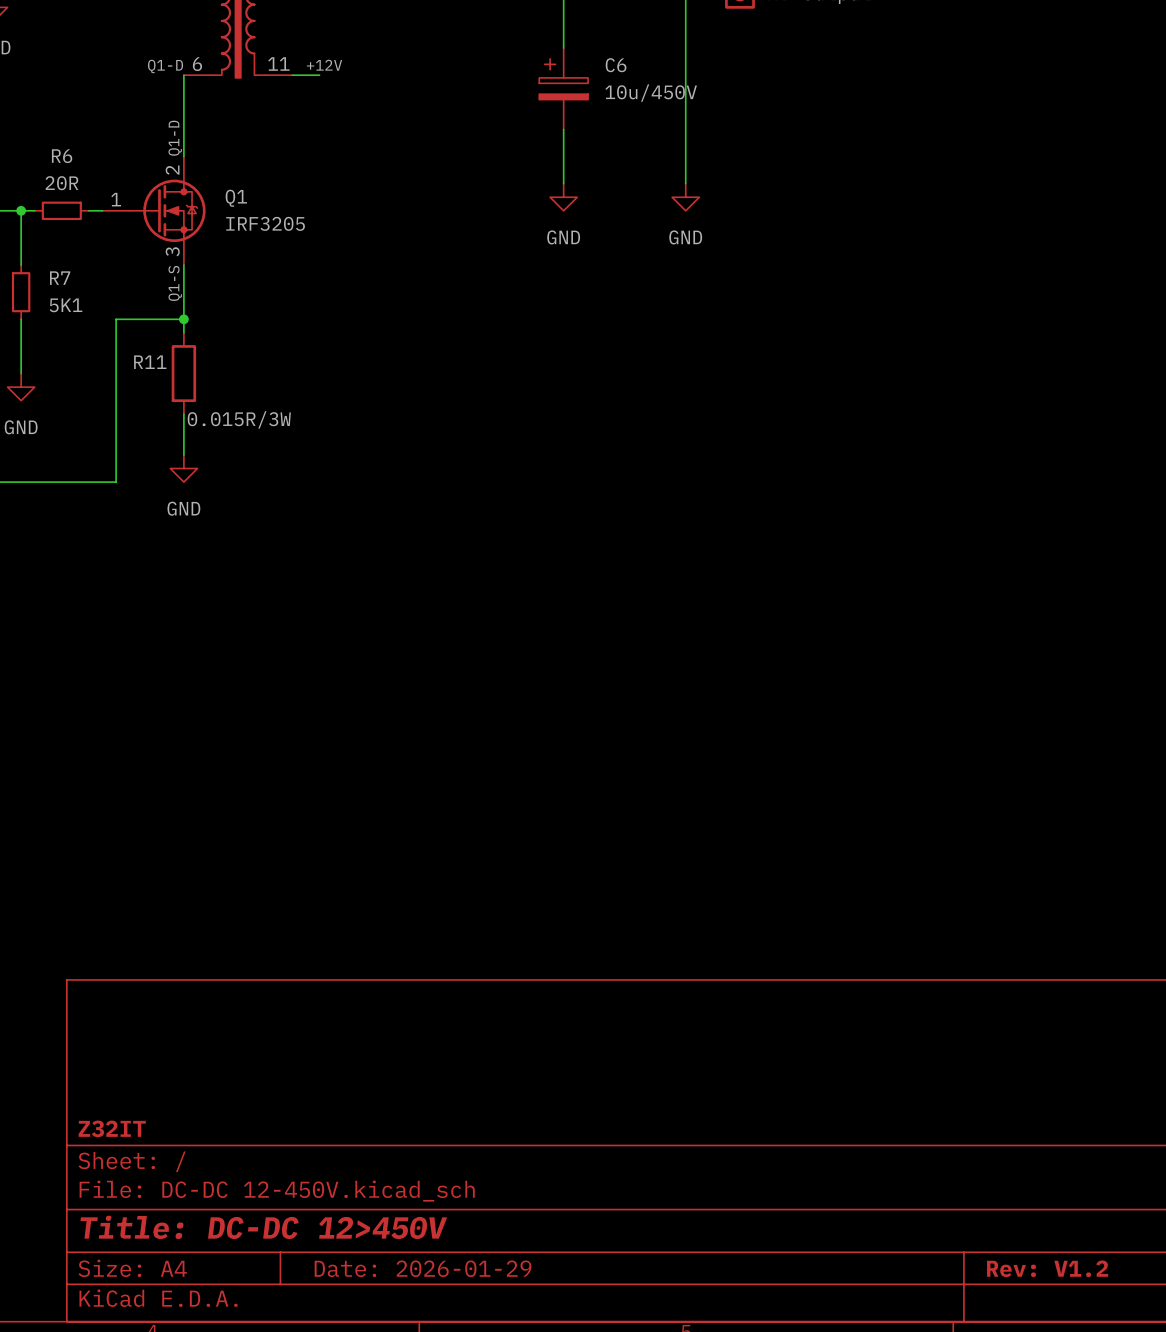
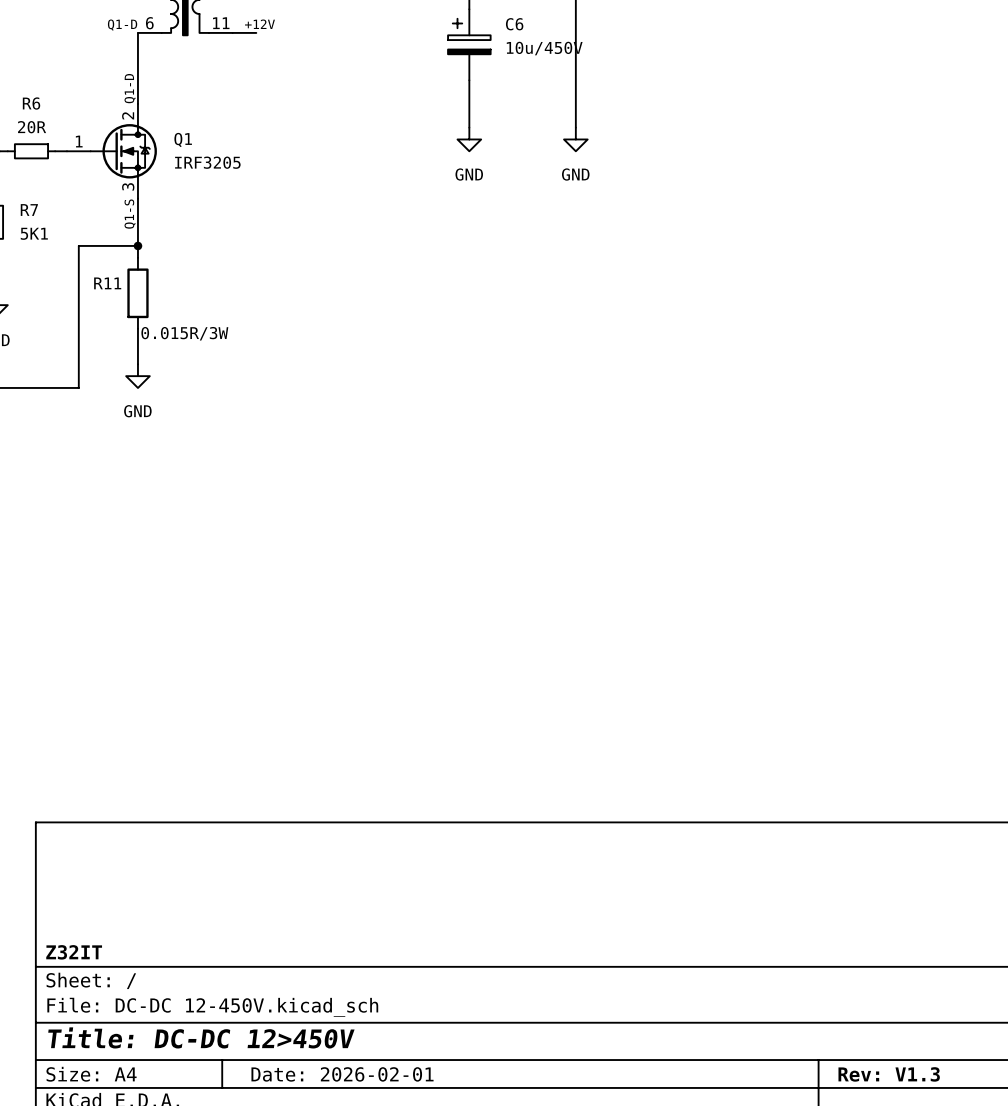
title block: Date: 2026-01-29 (423, 1268) -> Date: 2026-02-01 (342, 1074)
title block: Rev: V1.2 (1047, 1268) -> Rev: V1.3 (889, 1074)

